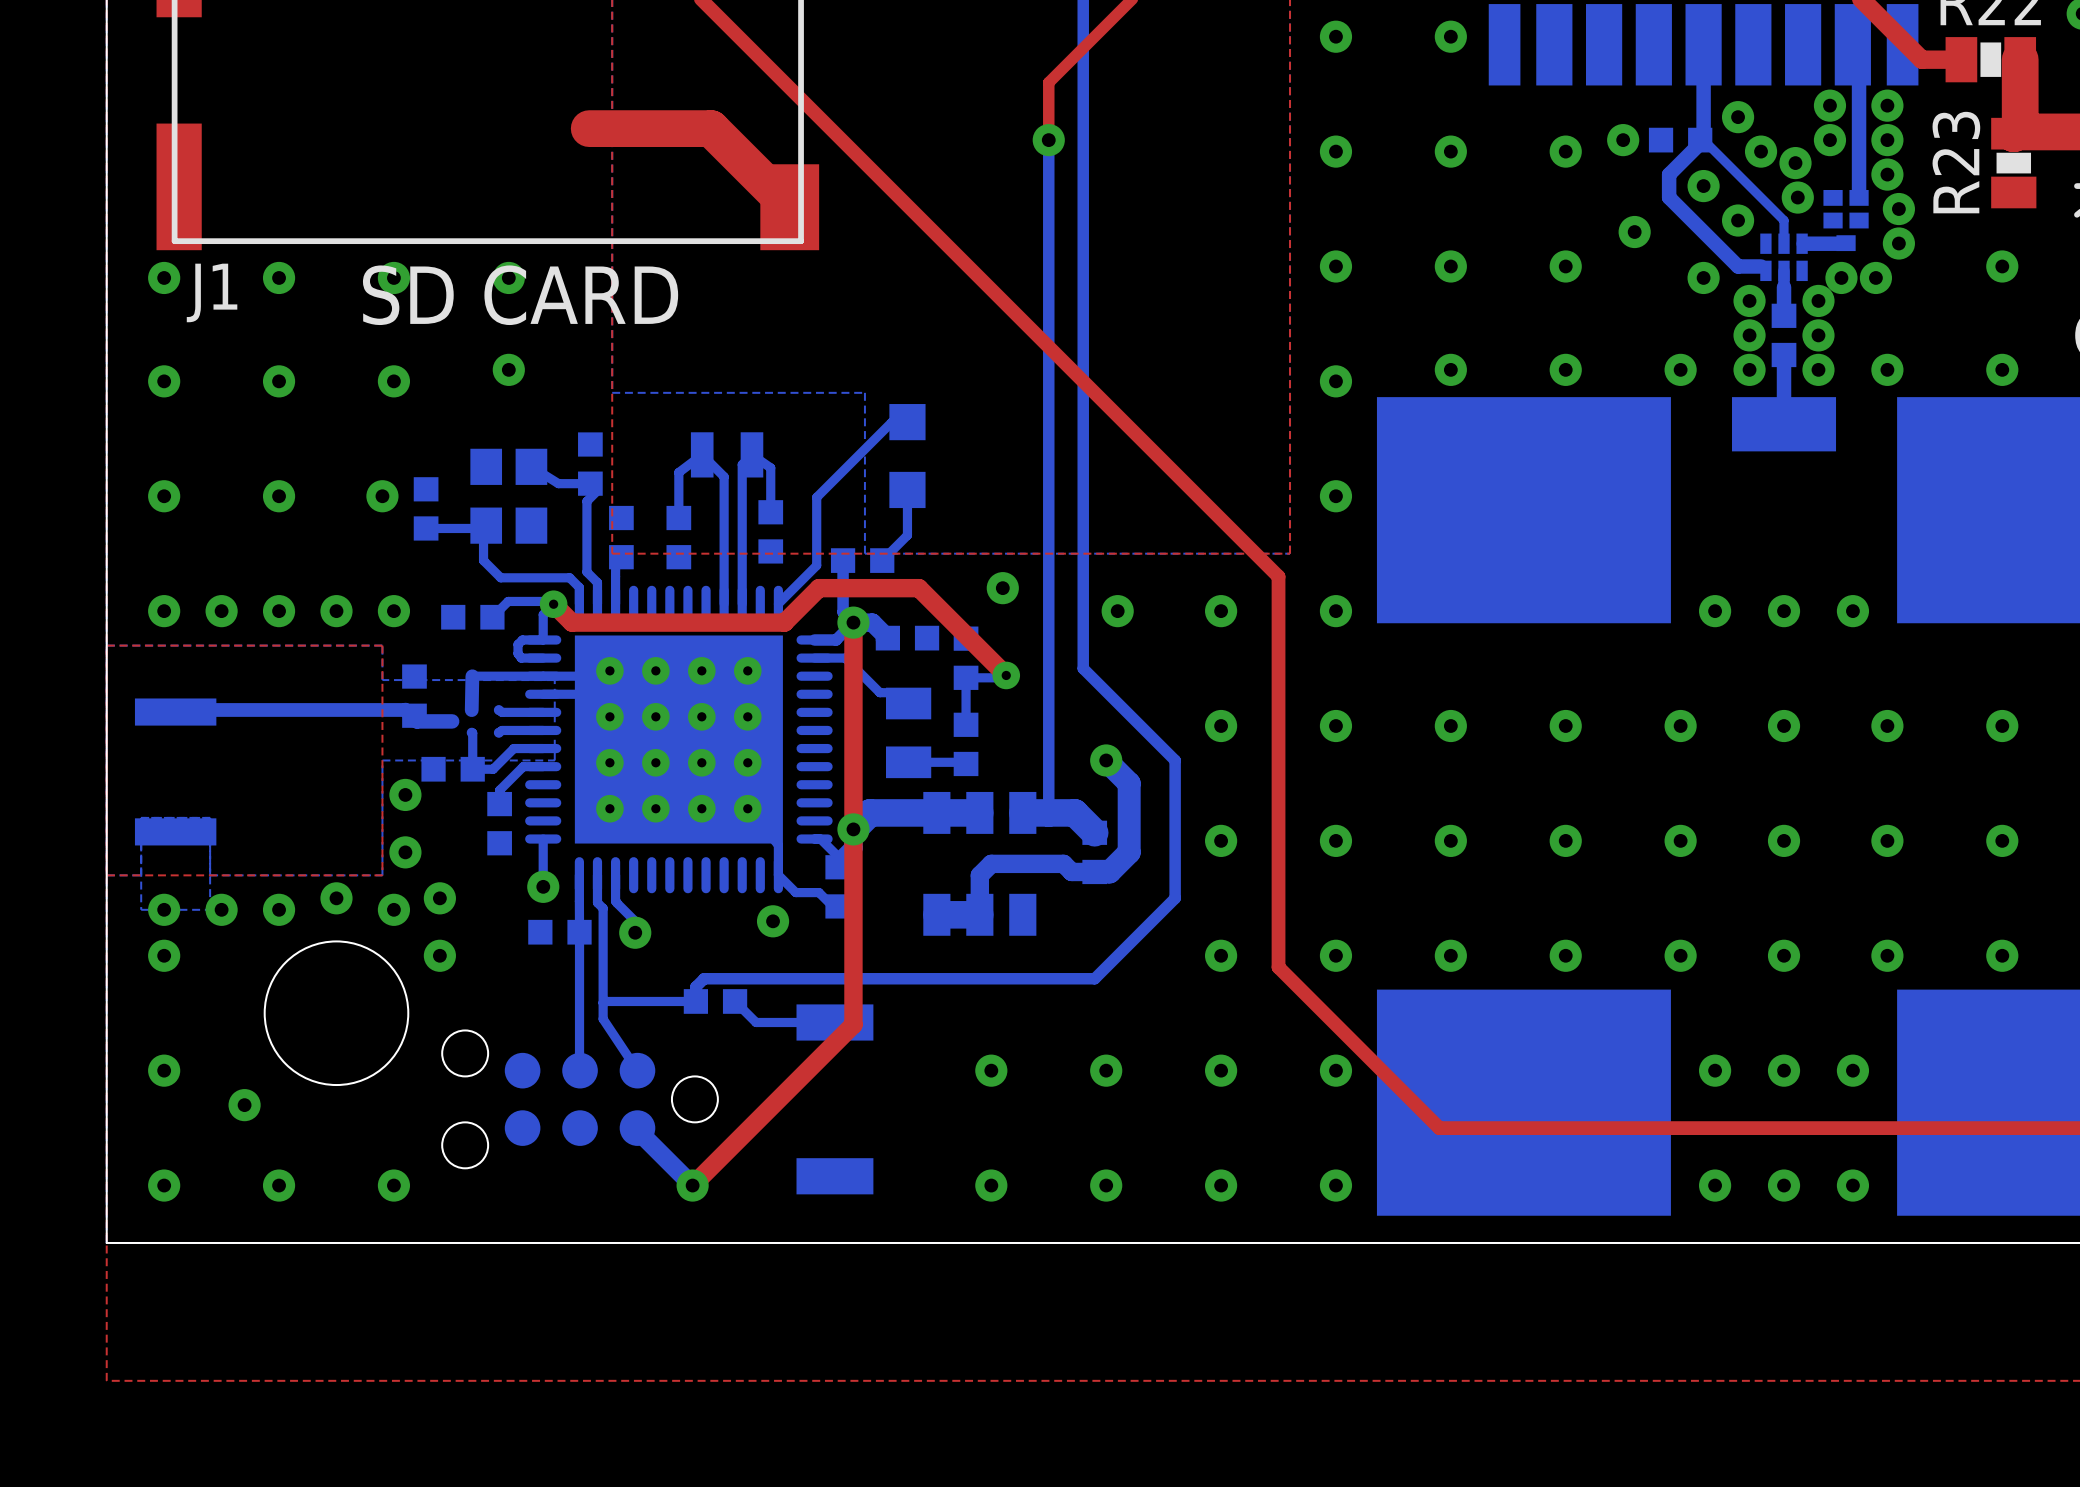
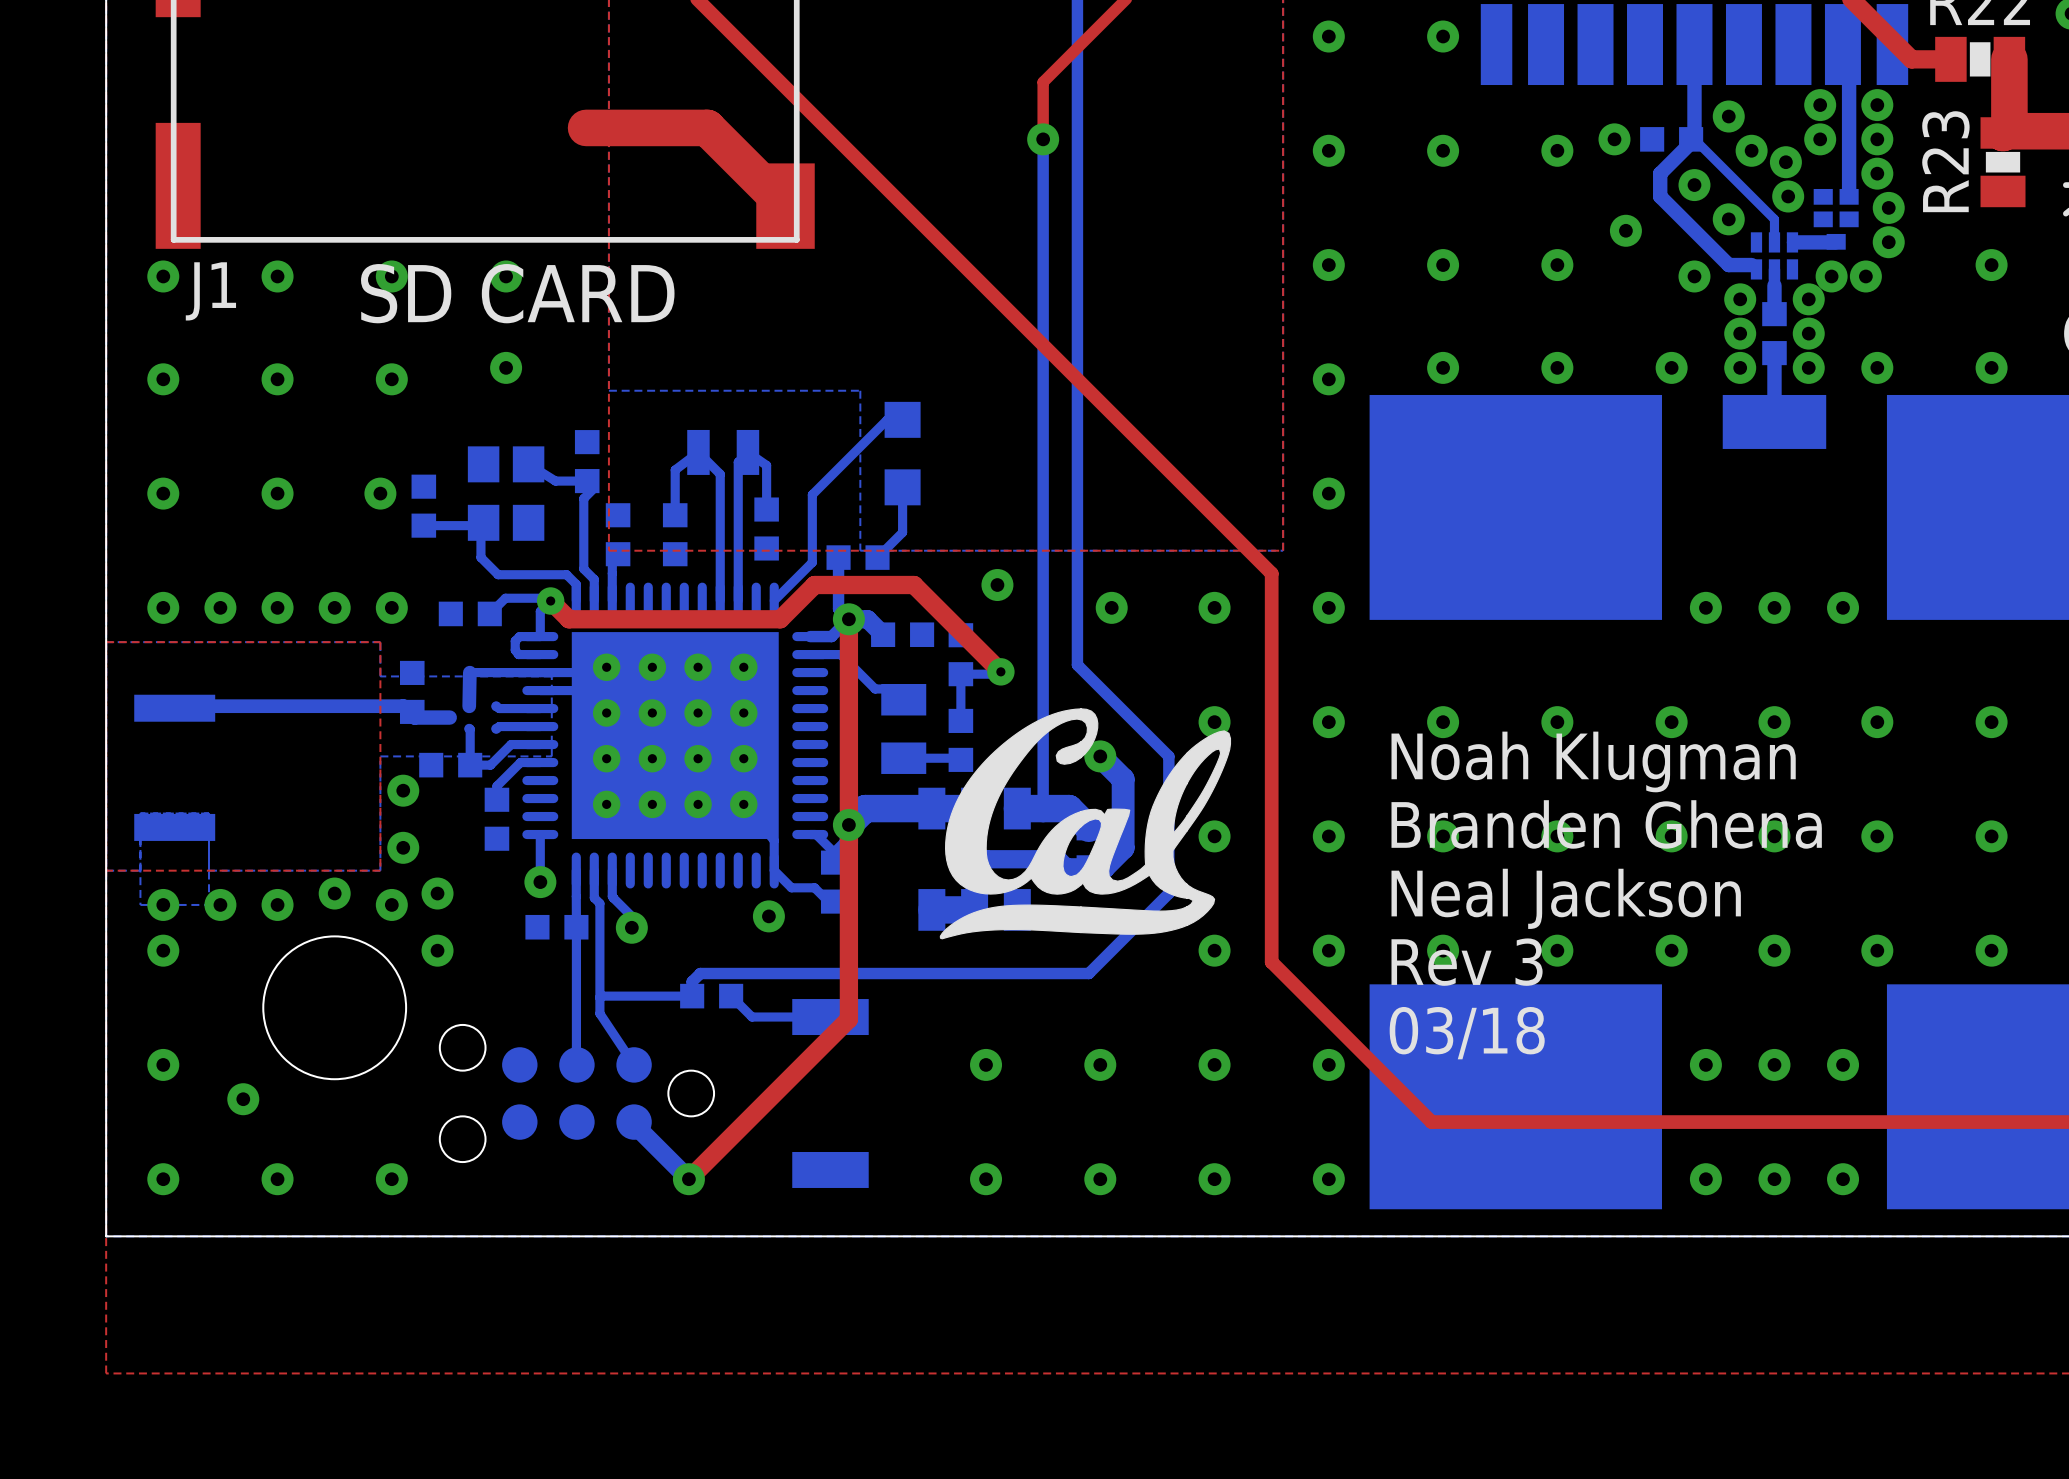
drawing: none -> [939, 708, 1232, 940]
text: none -> Noah Klugman (1593, 761)
text: none -> Branden Ghena (1606, 824)
text: none -> Neal Jackson (1566, 898)
text: none -> Rev 3 (1467, 962)
text: none -> 03/18 (1467, 1033)

